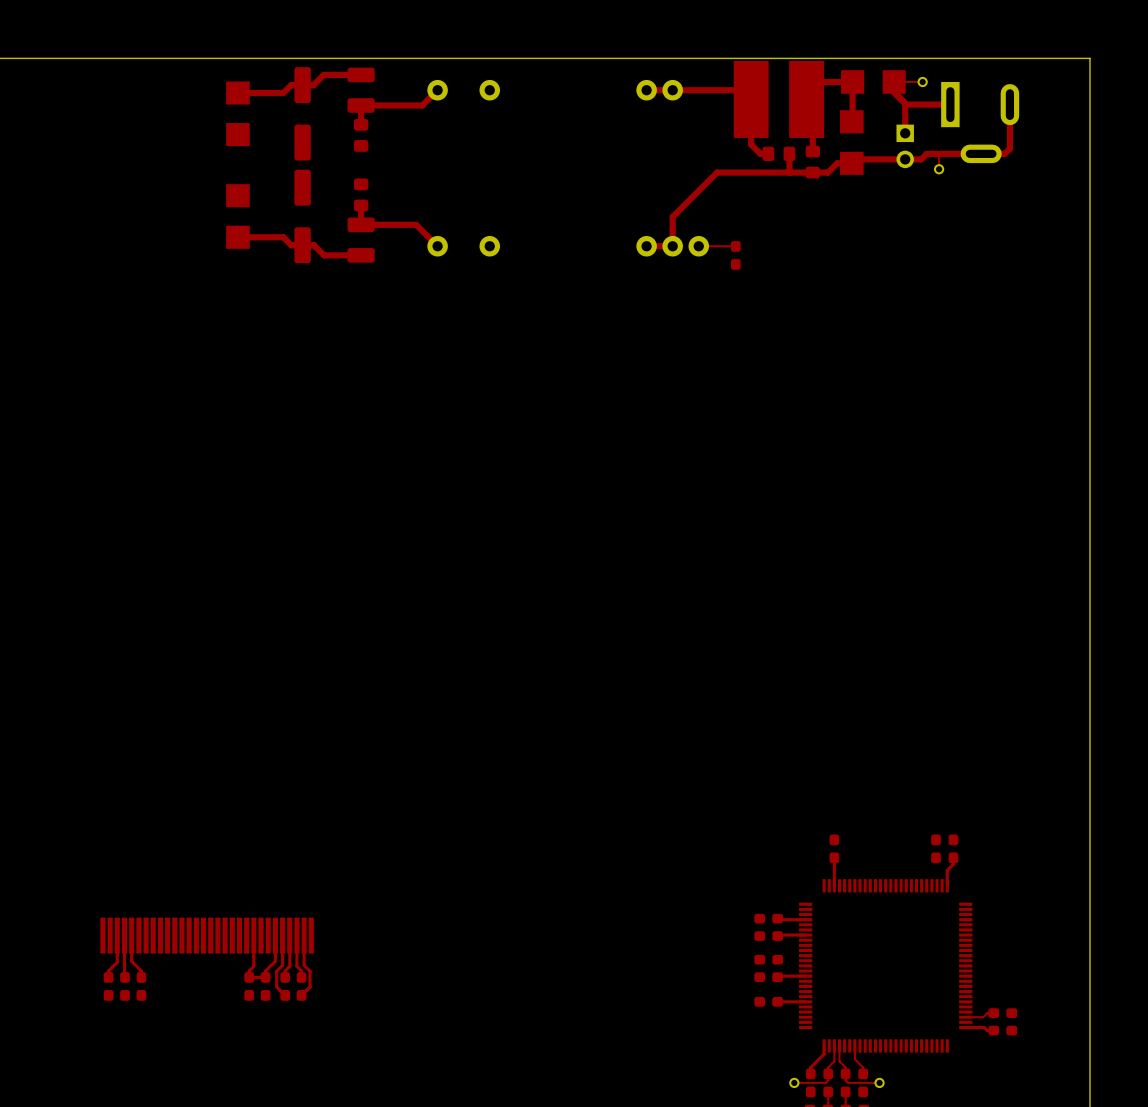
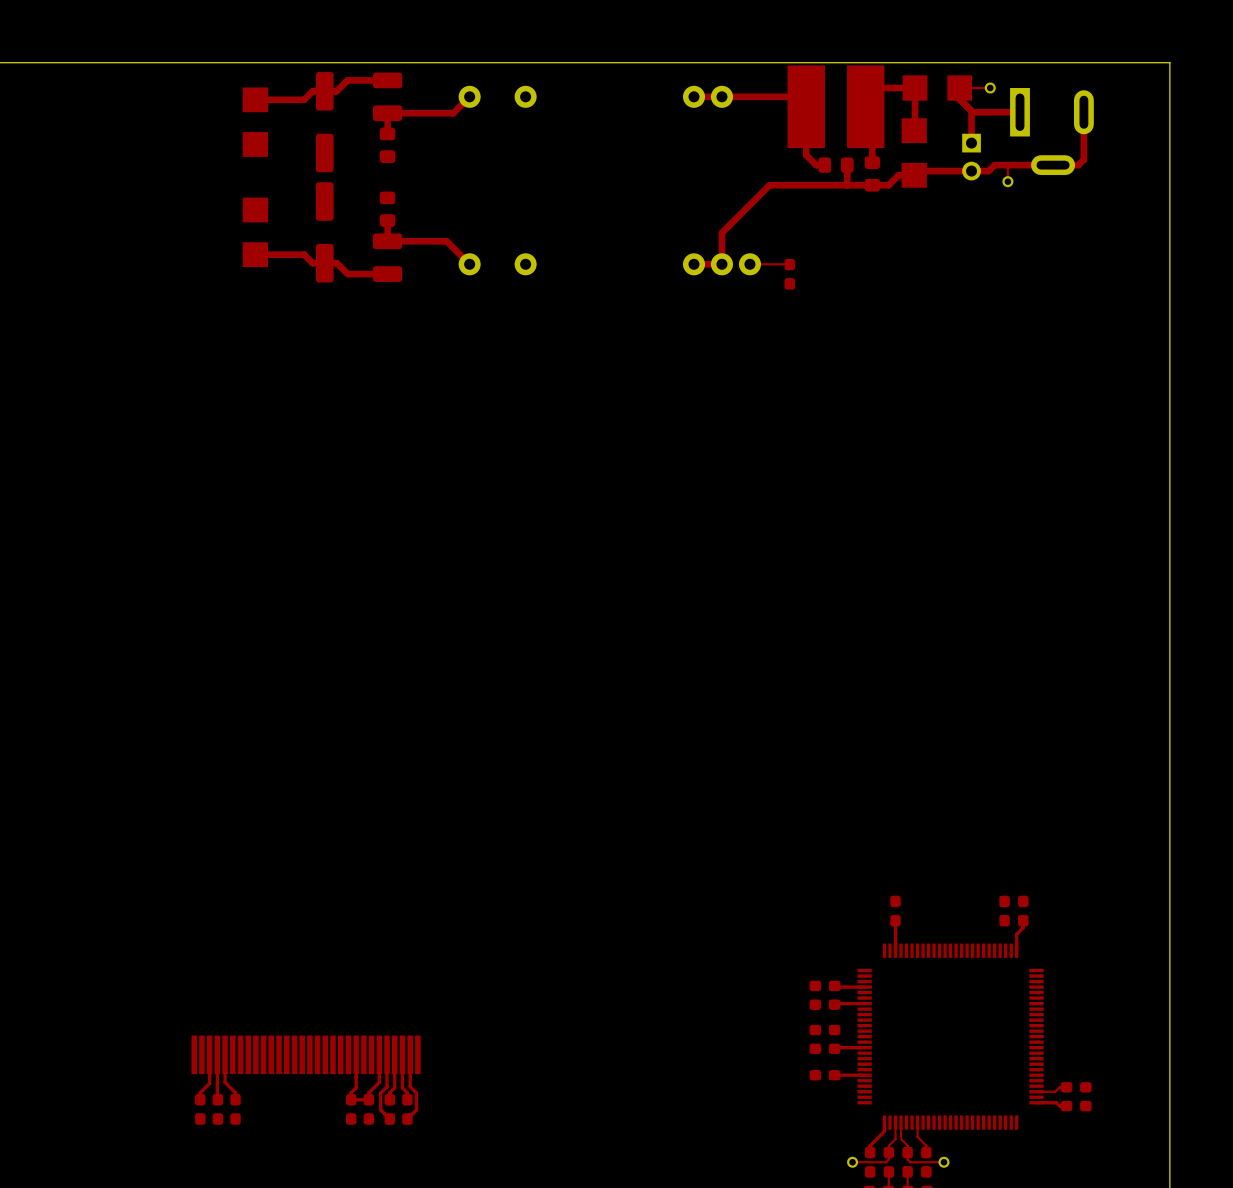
top track: (117, 935) (117, 962) (108, 971) (108, 977) -> (209, 1054) (209, 1083) (200, 1092) (200, 1099)
top track: (124, 935) (125, 977) -> (217, 1054) (217, 1099)
top track: (131, 935) (131, 961) (141, 971) (141, 977) -> (225, 1054) (225, 1082) (235, 1092) (235, 1099)
part: (207, 935) -> none
top track: (275, 935) (275, 961) (265, 971) (265, 977) (249, 977) (249, 971) (253, 966) (253, 935) -> (379, 1054) (379, 1082) (368, 1092) (368, 1099) (351, 1099) (351, 1092) (356, 1087) (356, 1054)
top track: (282, 935) (282, 965) (276, 971) (276, 986) (285, 995) -> (387, 1054) (387, 1086) (380, 1093) (380, 1109) (389, 1119)
top track: (289, 935) (289, 966) (285, 971) (285, 977) -> (394, 1054) (394, 1087) (389, 1092) (389, 1099)
top track: (296, 935) (296, 966) (301, 971) (301, 977) -> (402, 1054) (402, 1087) (407, 1092) (407, 1099)
top track: (304, 935) (304, 965) (310, 971) (310, 986) (301, 995) -> (410, 1054) (410, 1086) (416, 1093) (416, 1109) (407, 1119)
part footprint: [280, 972, 291, 1001] -> [191, 1035, 421, 1075]
part: (108, 986) -> none
part: (125, 986) -> none
part: (141, 986) -> none
part: (249, 986) -> none
part: (265, 986) -> none
part: (301, 986) -> none
part: none -> (200, 1109)
part: none -> (217, 1109)
part: none -> (235, 1109)
part: none -> (351, 1109)
part: none -> (368, 1109)
part: none -> (389, 1109)
part: none -> (407, 1109)

